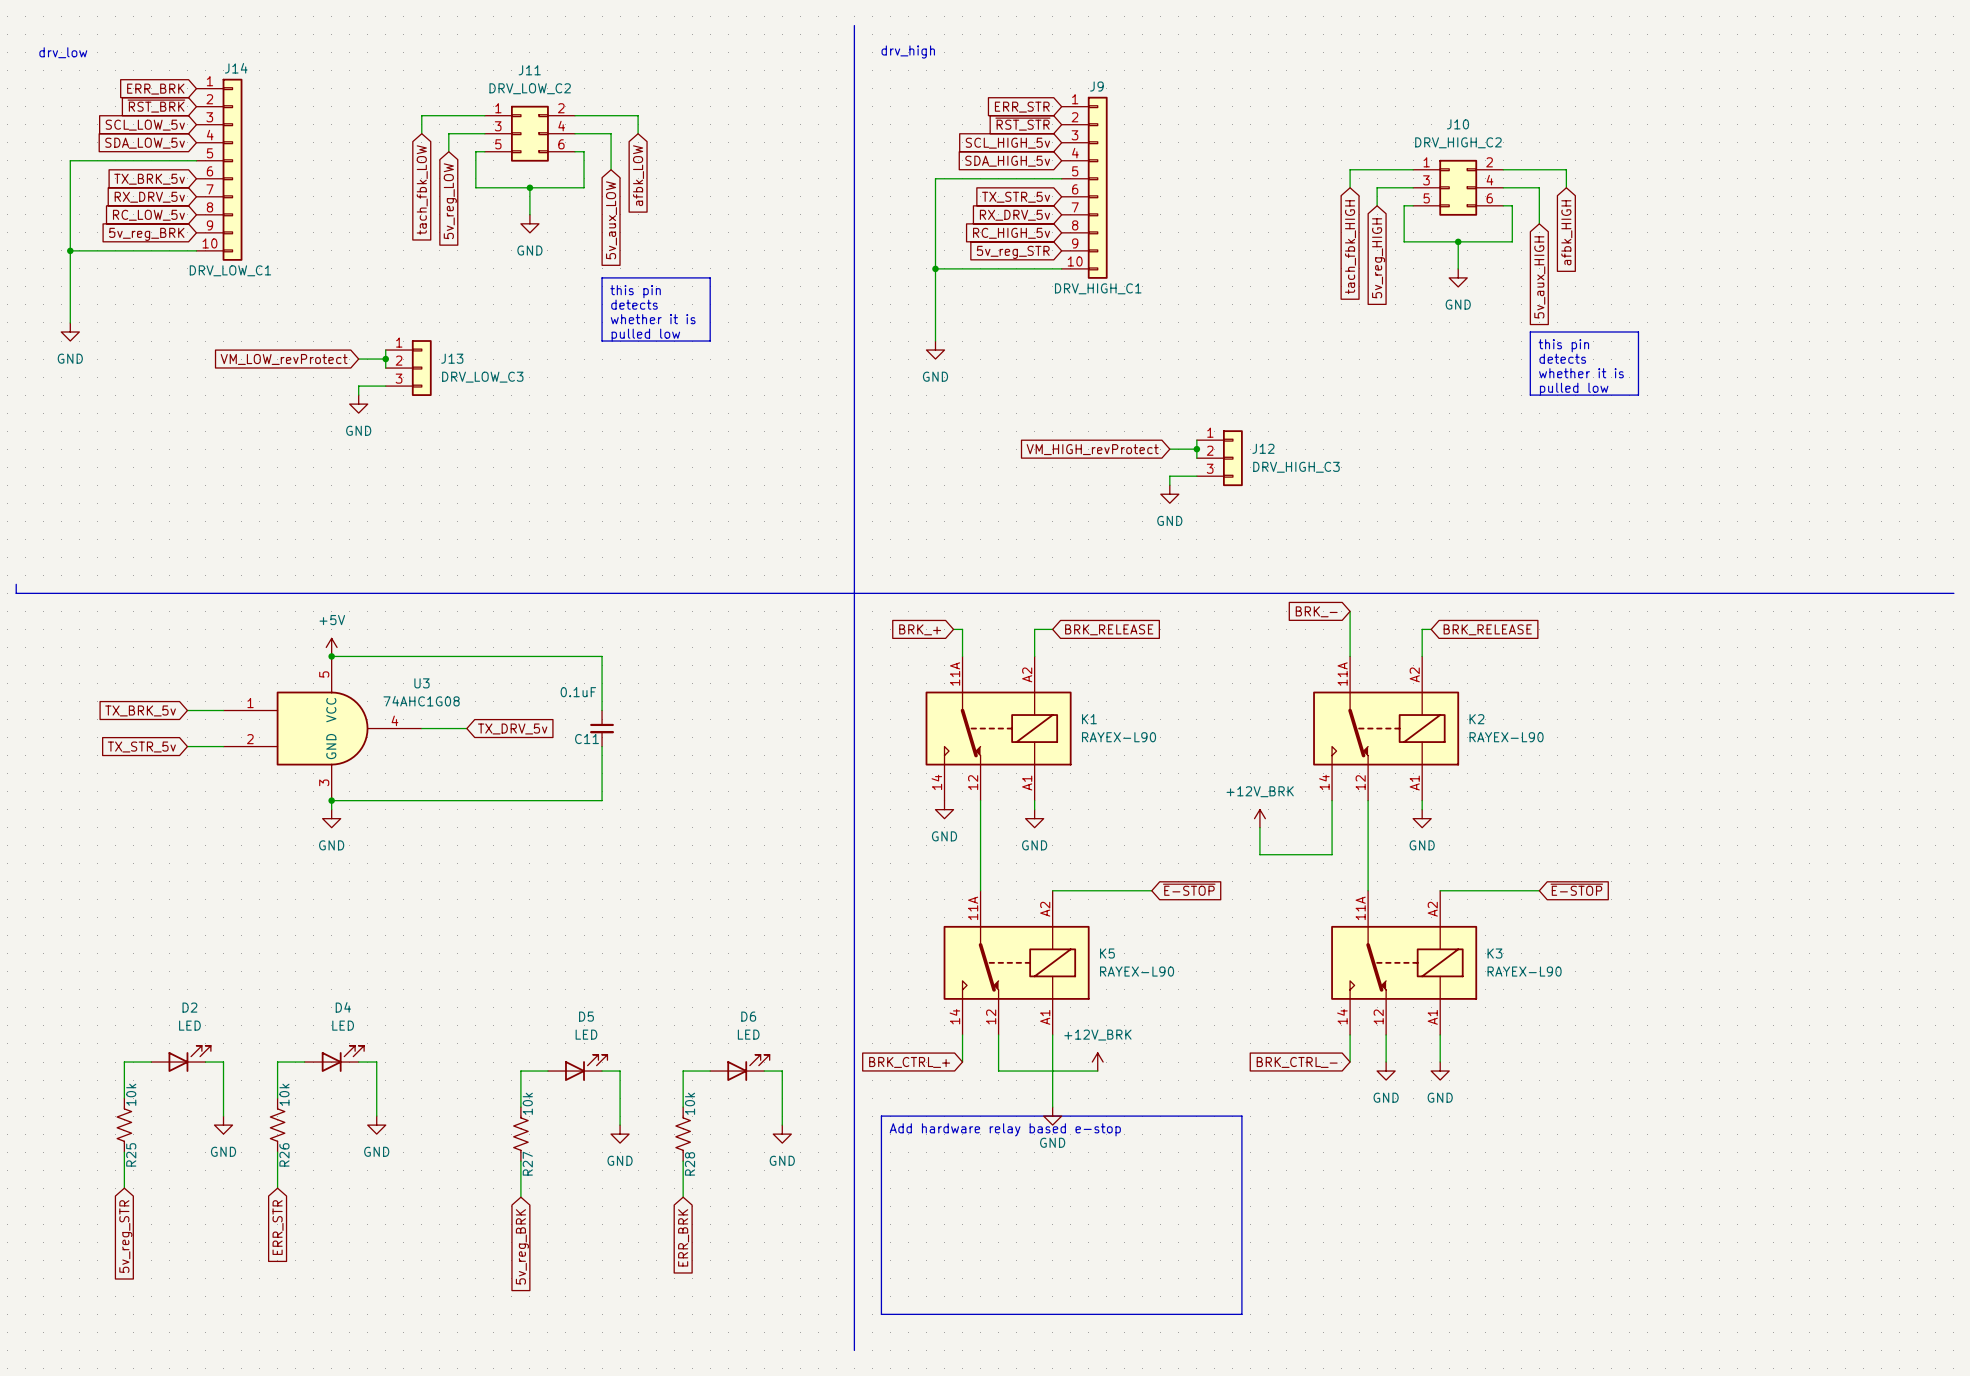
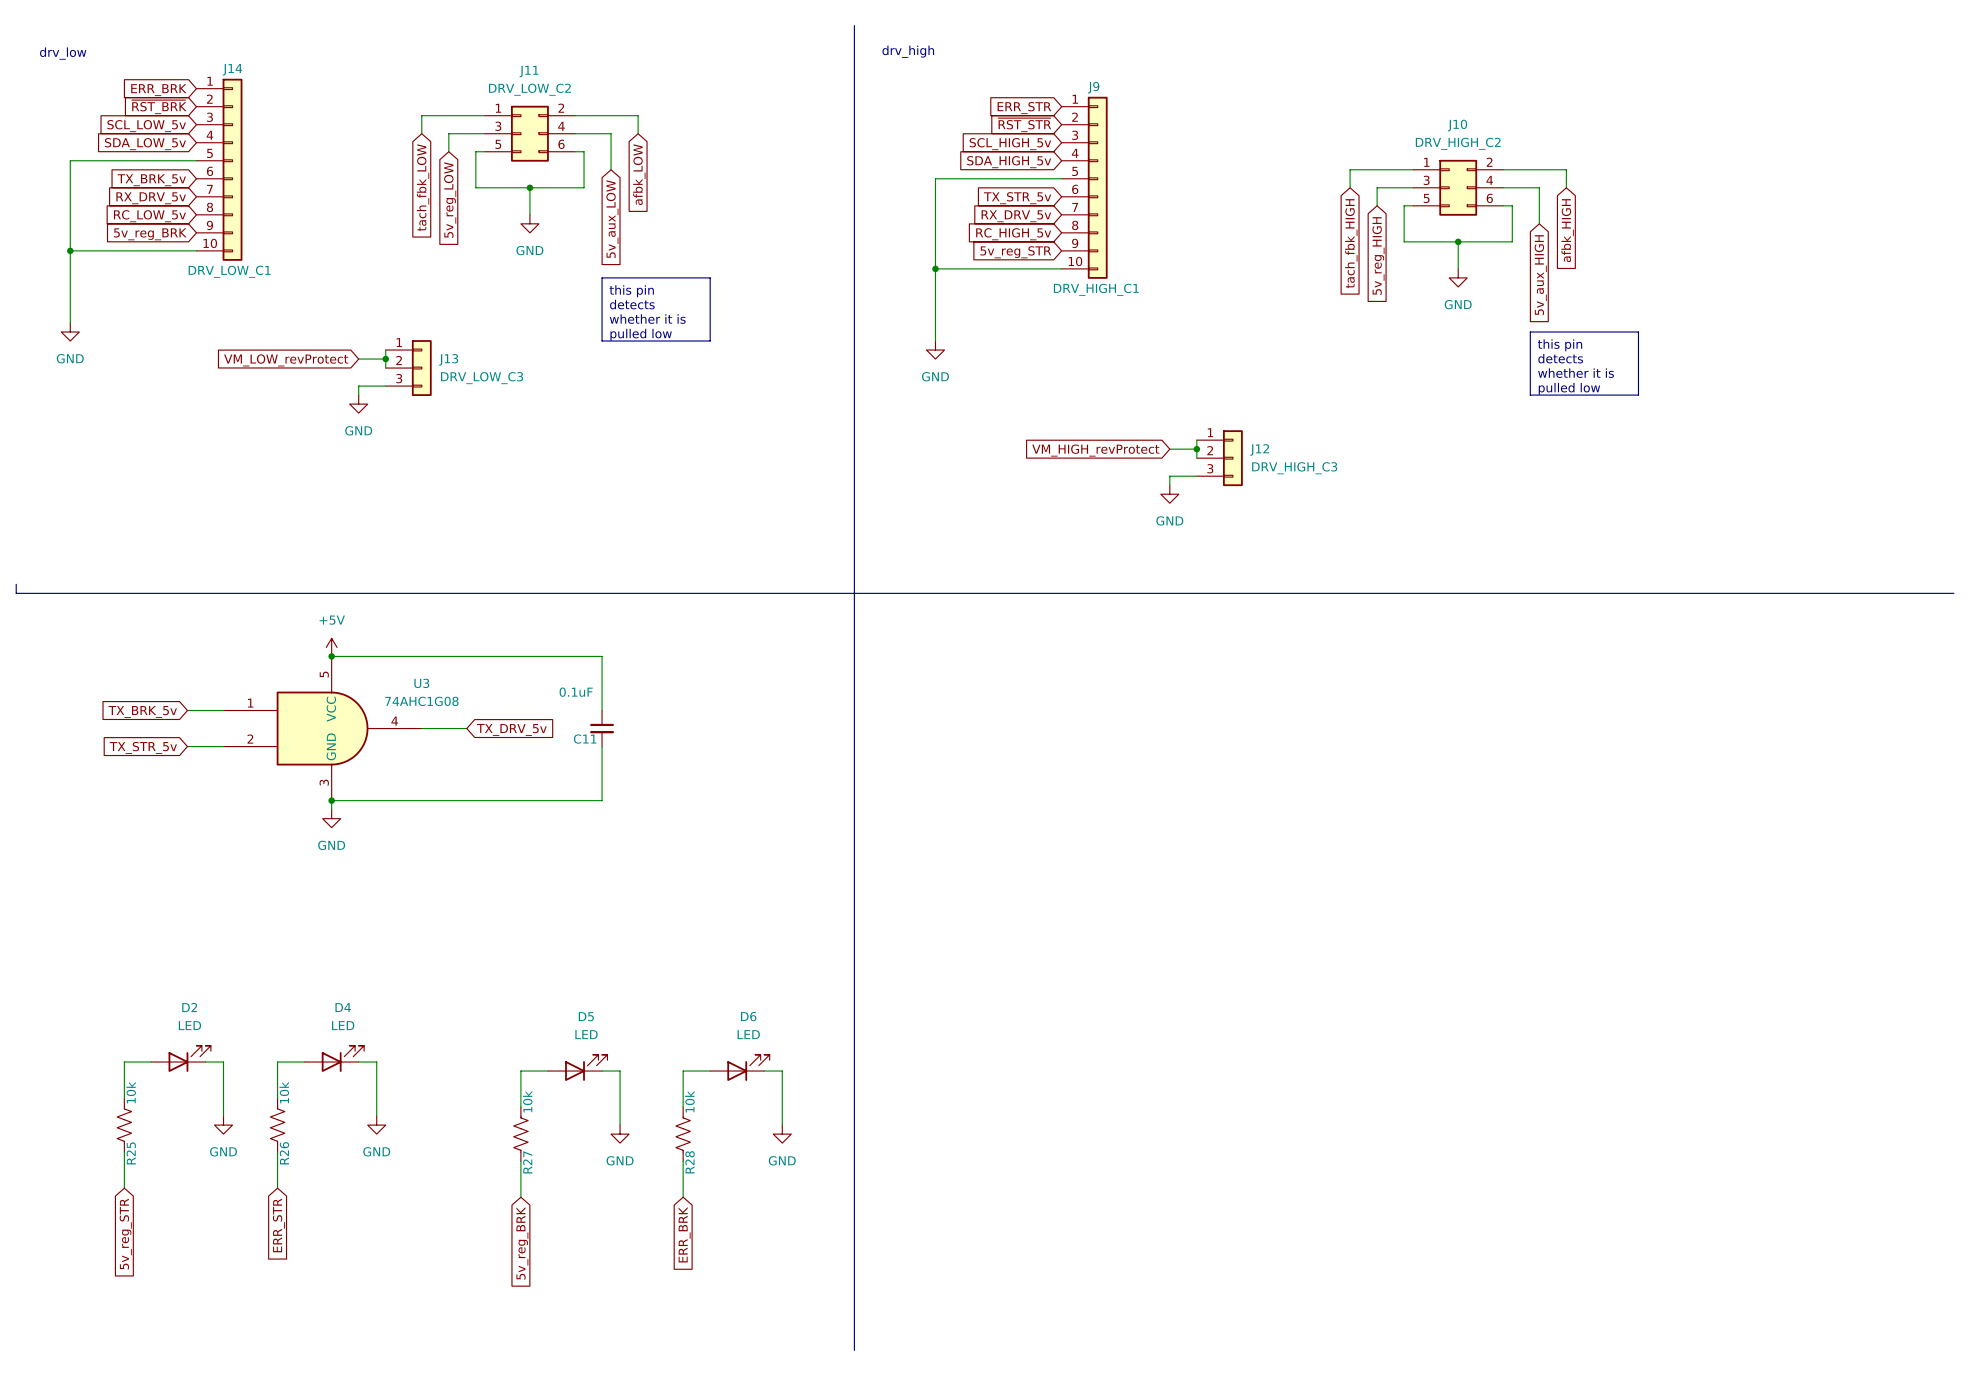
global label: BRK_- (1316, 611) -> none
wire: (1350, 611) (1350, 656) -> none
global label: BRK_+ (920, 629) -> none
wire: (953, 629) (962, 629) (962, 656) -> none
wire: (1052, 629) (1034, 629) (1034, 656) -> none
global label: BRK_RELEASE (1109, 629) -> none
wire: (1431, 629) (1422, 629) (1422, 656) -> none
global label: BRK_RELEASE (1487, 629) -> none
K1: RAYEX-L90 (998, 728) -> none
K2: RAYEX-L90 (1386, 728) -> none
wire: (980, 800) (980, 890) -> none
wire: (1034, 800) (1034, 809) -> none
wire: (1332, 800) (1332, 854) (1259, 854) (1259, 827) -> none
wire: (1368, 800) (1368, 890) -> none
wire: (1422, 800) (1422, 809) -> none
power symbol: GND (944, 809) -> none
power symbol: GND (1034, 818) -> none
power symbol: +12V_BRK (1259, 818) -> none
power symbol: GND (1422, 818) -> none
global label: ~{E-STOP} (1189, 889) -> none
global label: ~{E-STOP} (1576, 889) -> none
wire: (1052, 890) (1151, 890) -> none
wire: (1440, 890) (1539, 890) -> none
K5: RAYEX-L90 (1016, 962) -> none
K3: RAYEX-L90 (1404, 962) -> none
wire: (962, 1034) (962, 1062) -> none
wire: (998, 1034) (998, 1071) (1097, 1071) -> none
wire: (1052, 1034) (1052, 1107) -> none
wire: (1350, 1034) (1350, 1062) -> none
wire: (1386, 1034) (1386, 1062) -> none
wire: (1440, 1034) (1440, 1062) -> none
global label: BRK_CTRL_+ (909, 1062) -> none
power symbol: +12V_BRK (1097, 1062) -> none
global label: BRK_CTRL_- (1297, 1062) -> none
power symbol: GND (1386, 1071) -> none
power symbol: GND (1440, 1071) -> none
line: (881, 1116) (1241, 1116) (1241, 1314) (881, 1314) (881, 1116) -> none
power symbol: GND (1052, 1116) -> none
text: Add hardware relay based e-stop (1005, 1129) -> none

